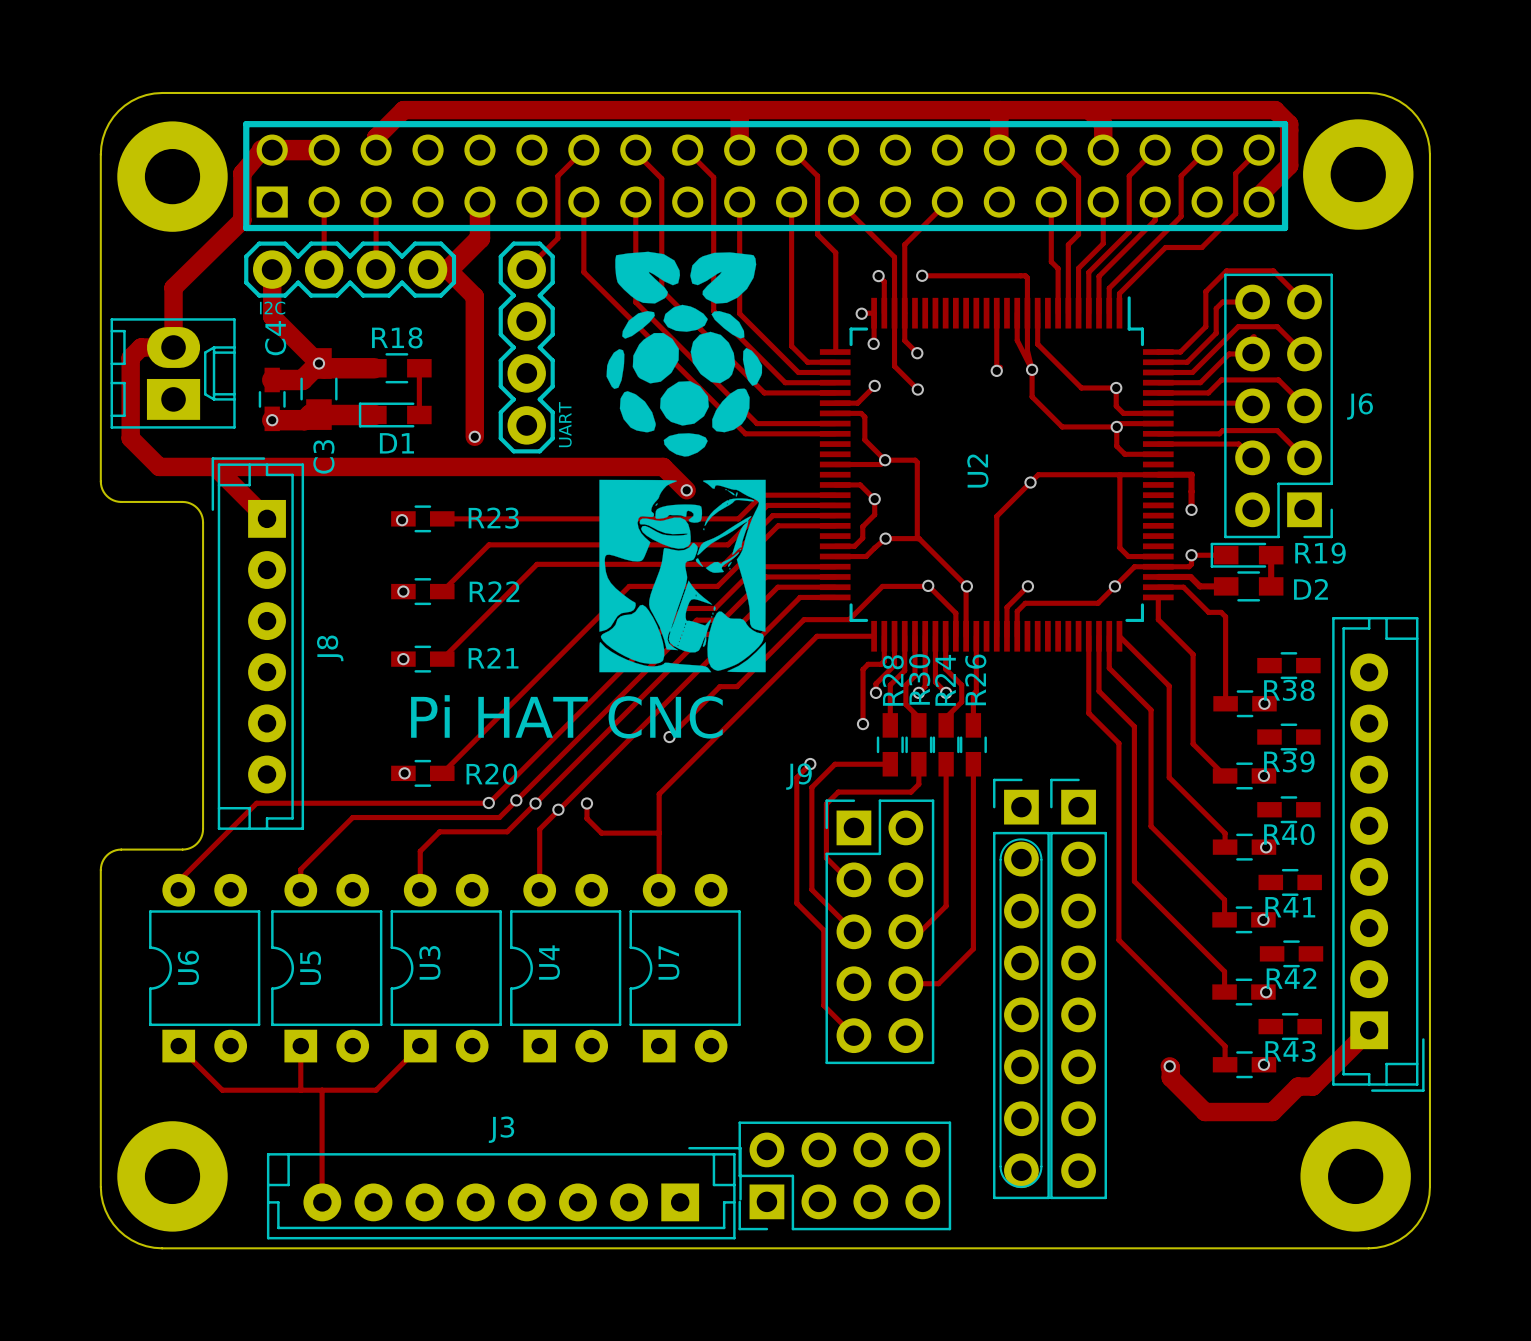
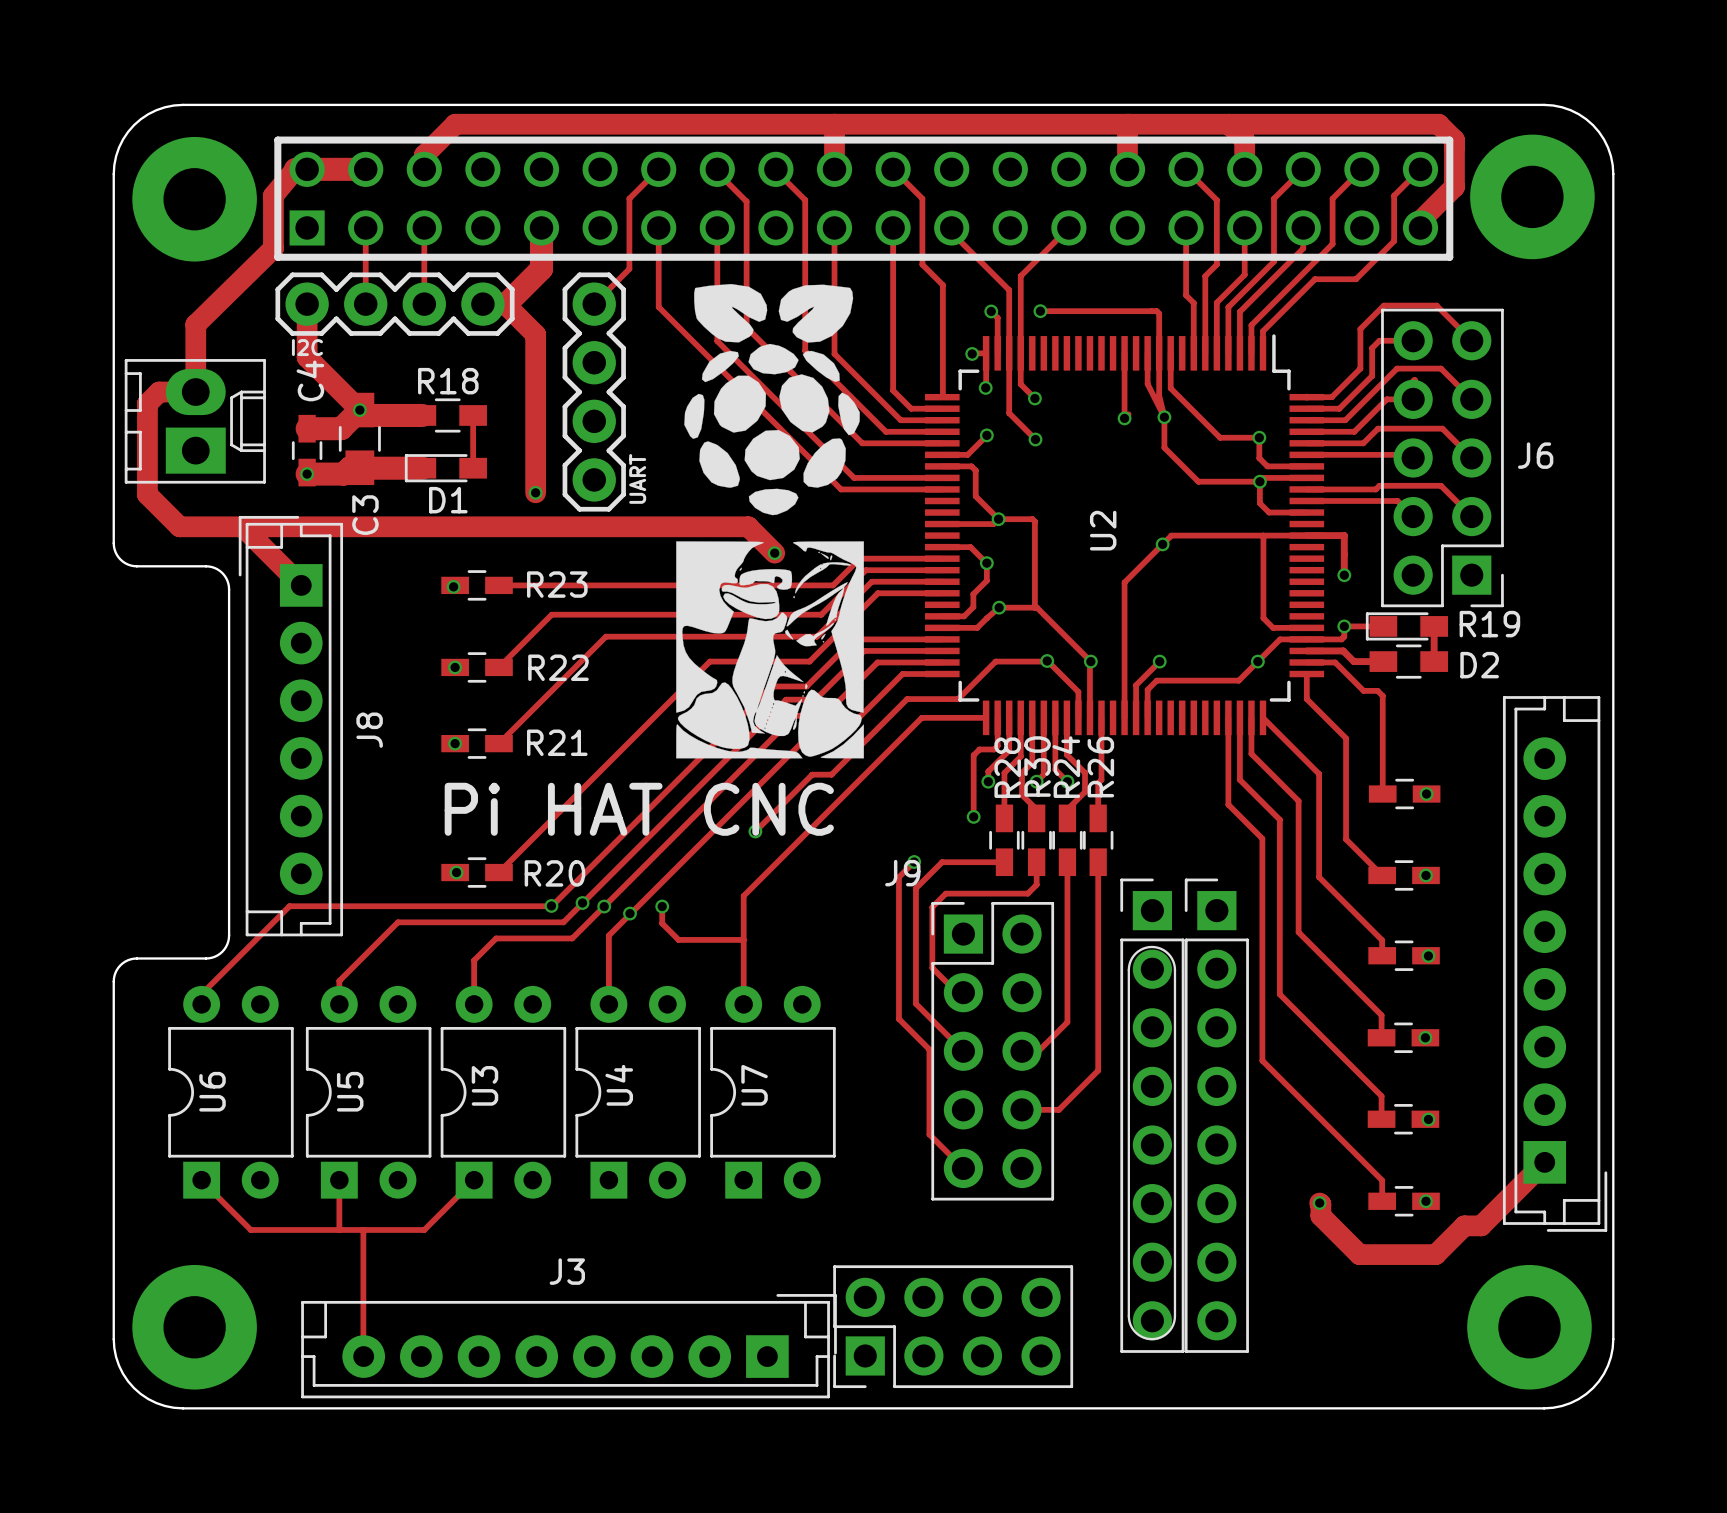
R38: (1288, 665) -> none
R39: (1288, 737) -> none
R40: (1288, 809) -> none
R41: (1290, 882) -> none
R42: (1291, 953) -> none
R43: (1290, 1026) -> none

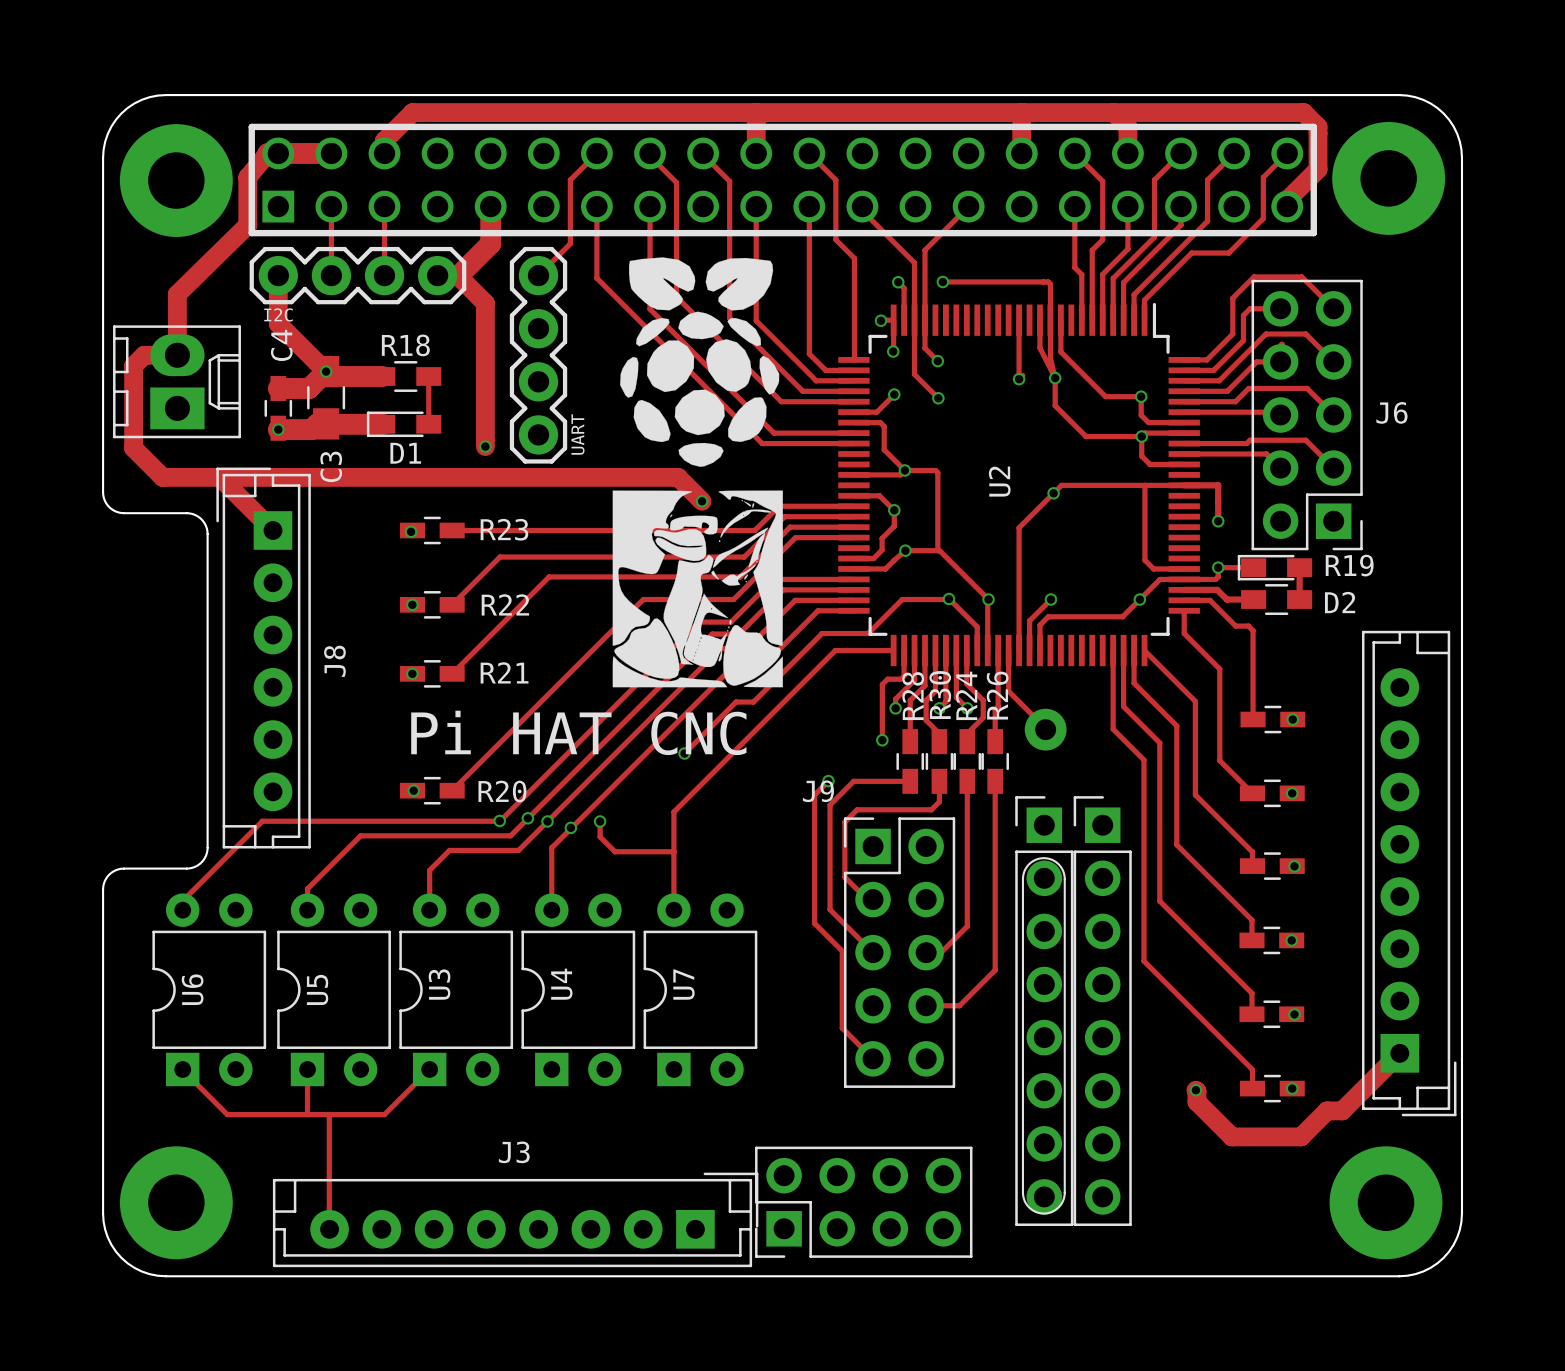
track: none -> (1008, 650) (1008, 691) (1045, 729)
part: none -> (1045, 729)

